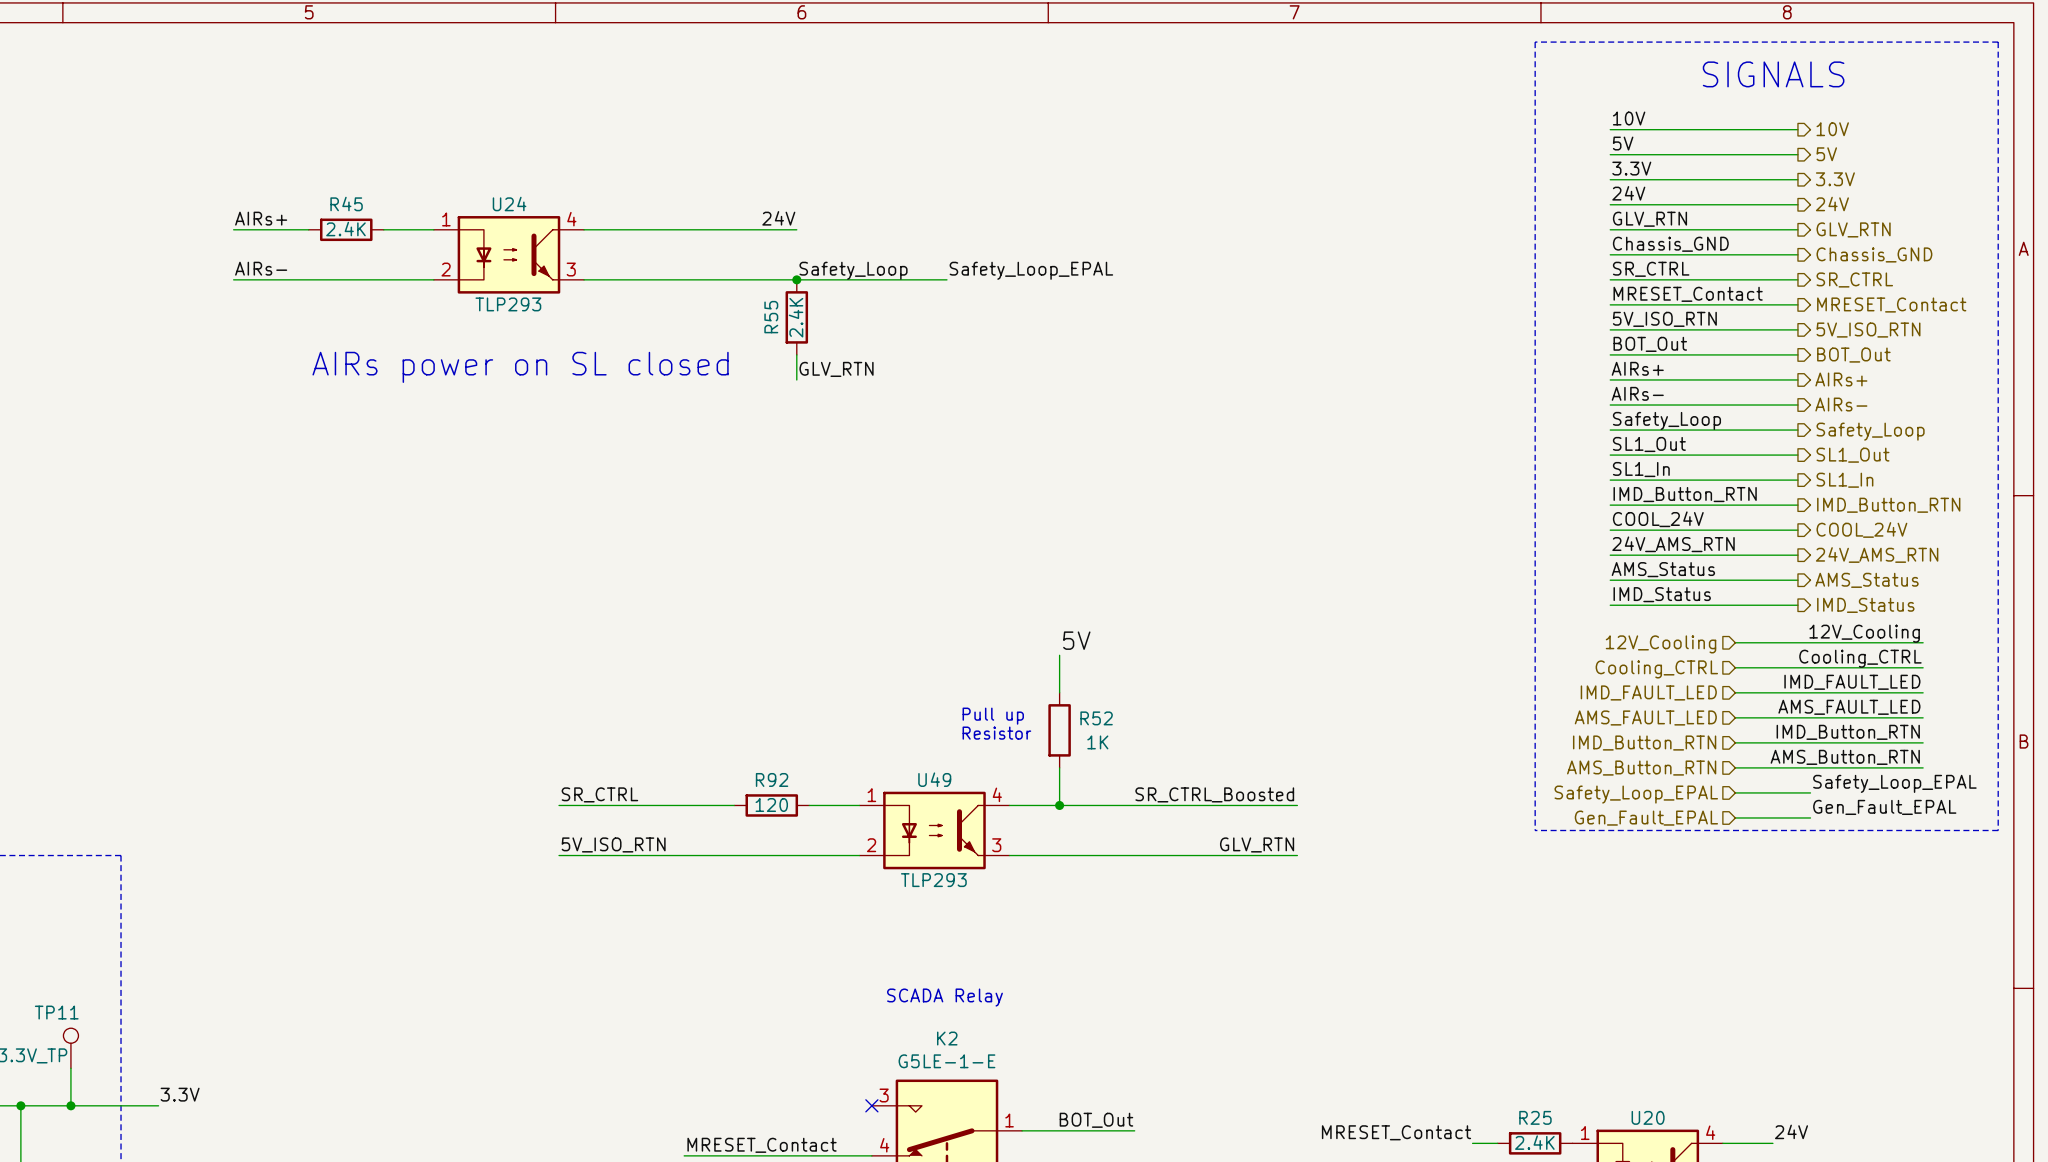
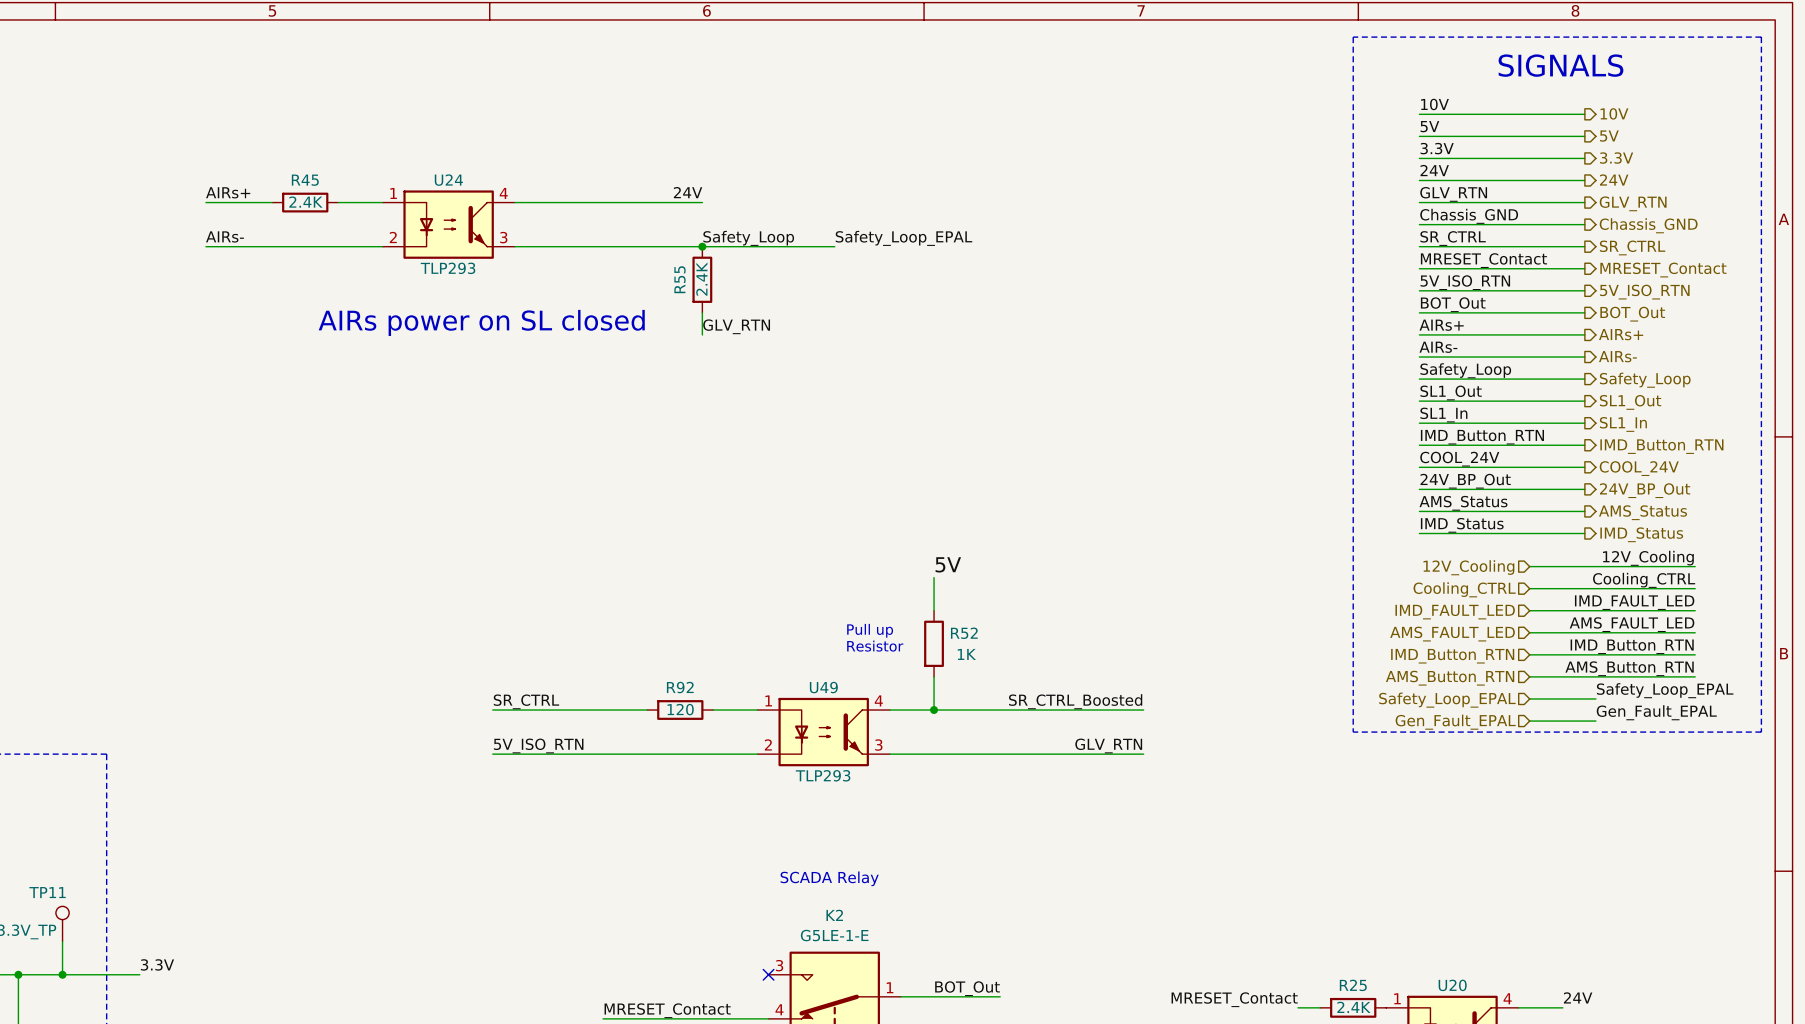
label: 24V_AMS_RTN (1673, 544) -> 24V_BP_Out (1465, 481)
hierarchical label: 24V_AMS_RTN (1877, 555) -> 24V_BP_Out (1645, 490)

